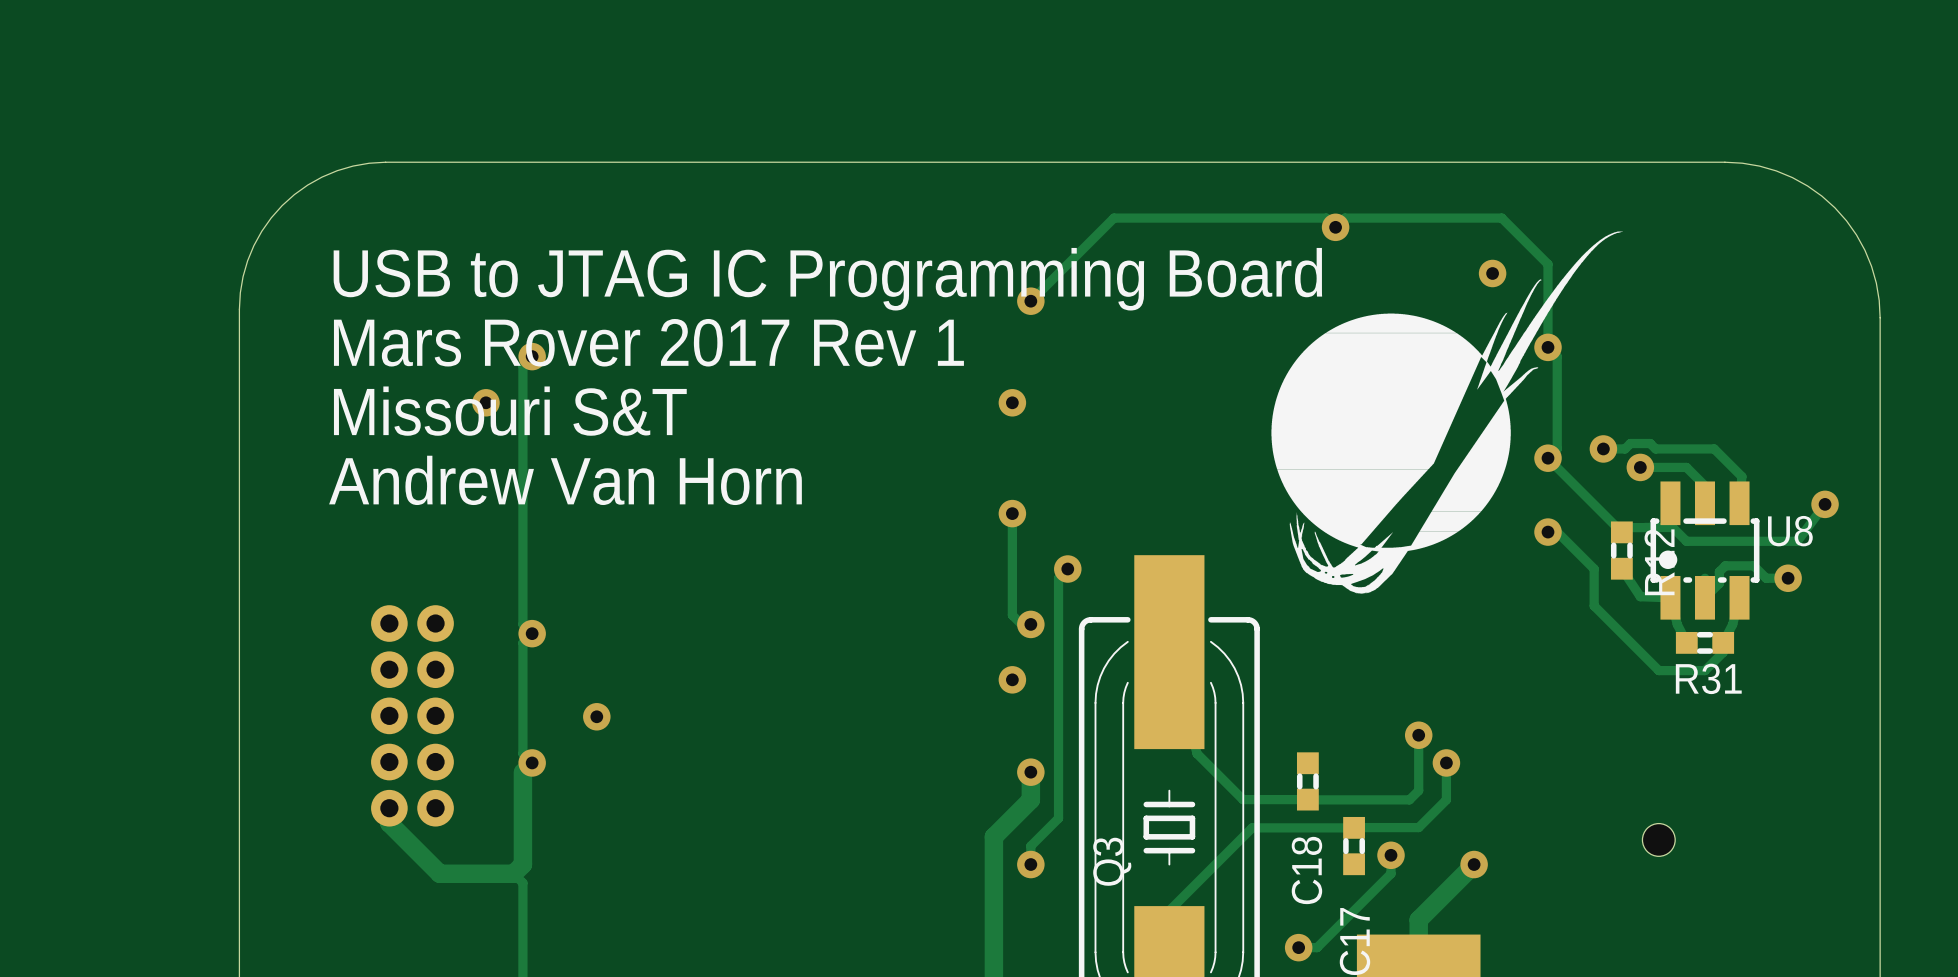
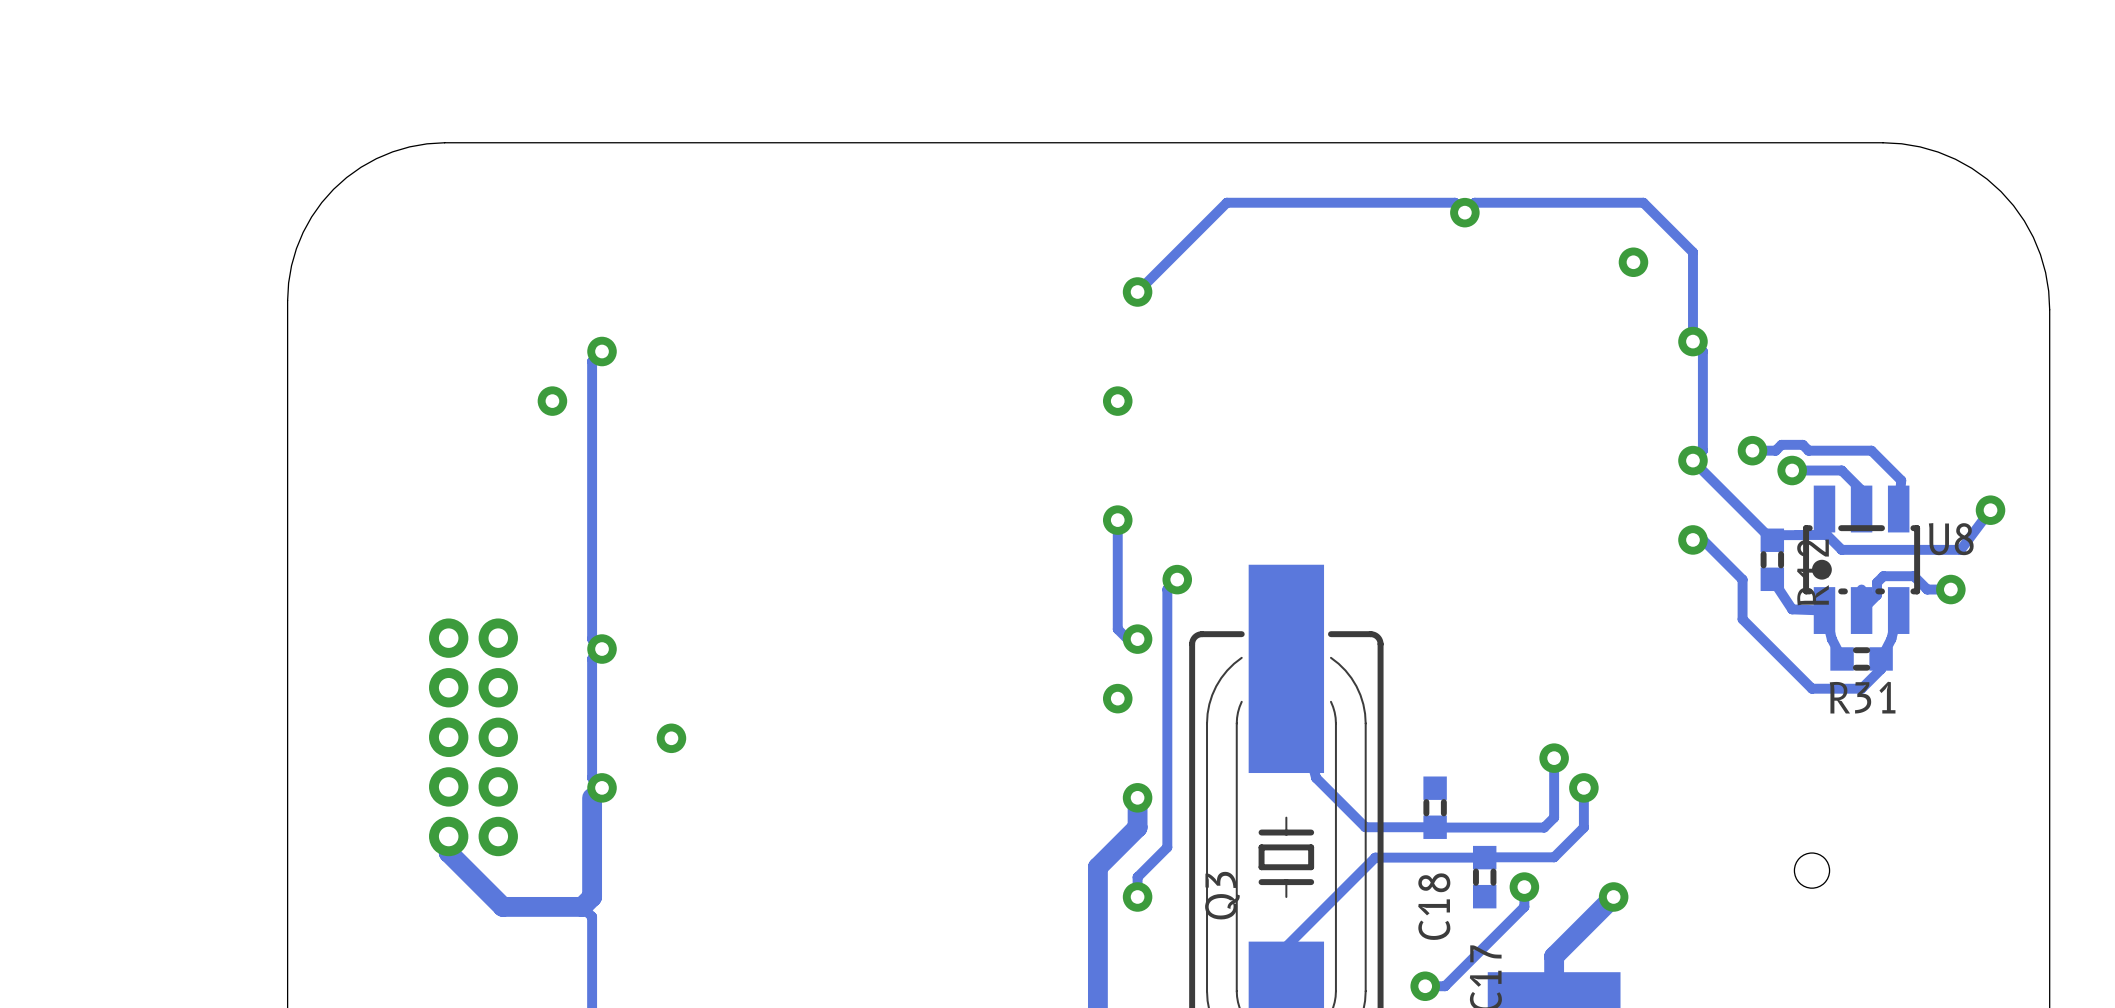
drawing: [1271, 231, 1623, 594] -> none
text: USB to JTAG IC Programming Board (827, 279) -> none
text: Mars Rover 2017 Rev 1 (648, 342) -> none
text: Missouri S&T (510, 411) -> none
text: Andrew Van Horn (565, 480) -> none

